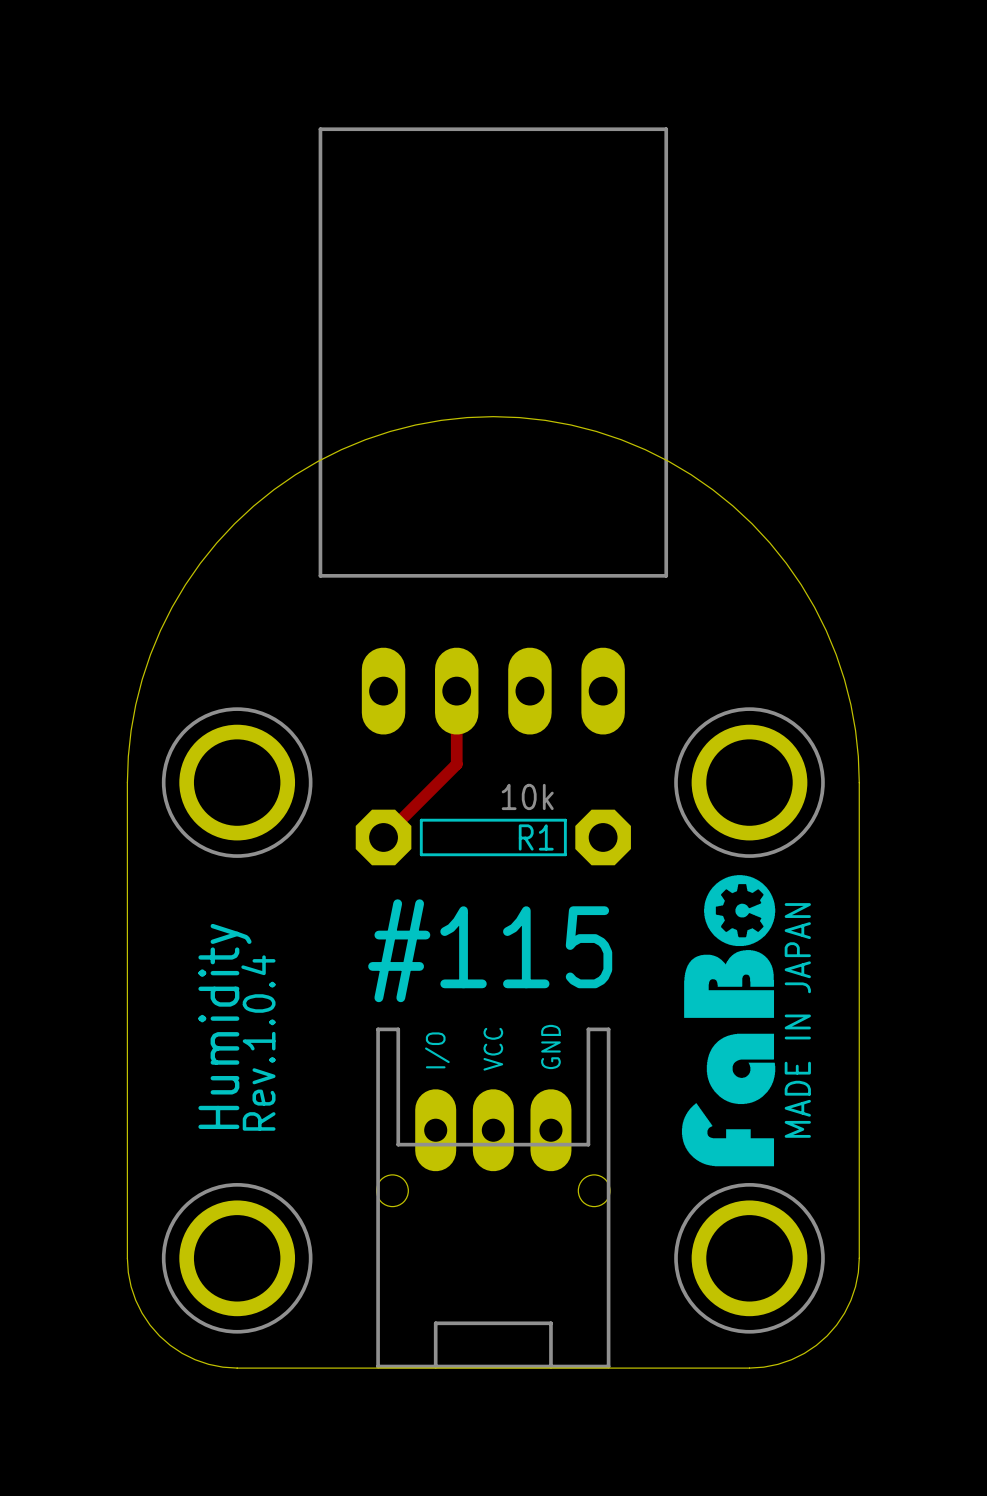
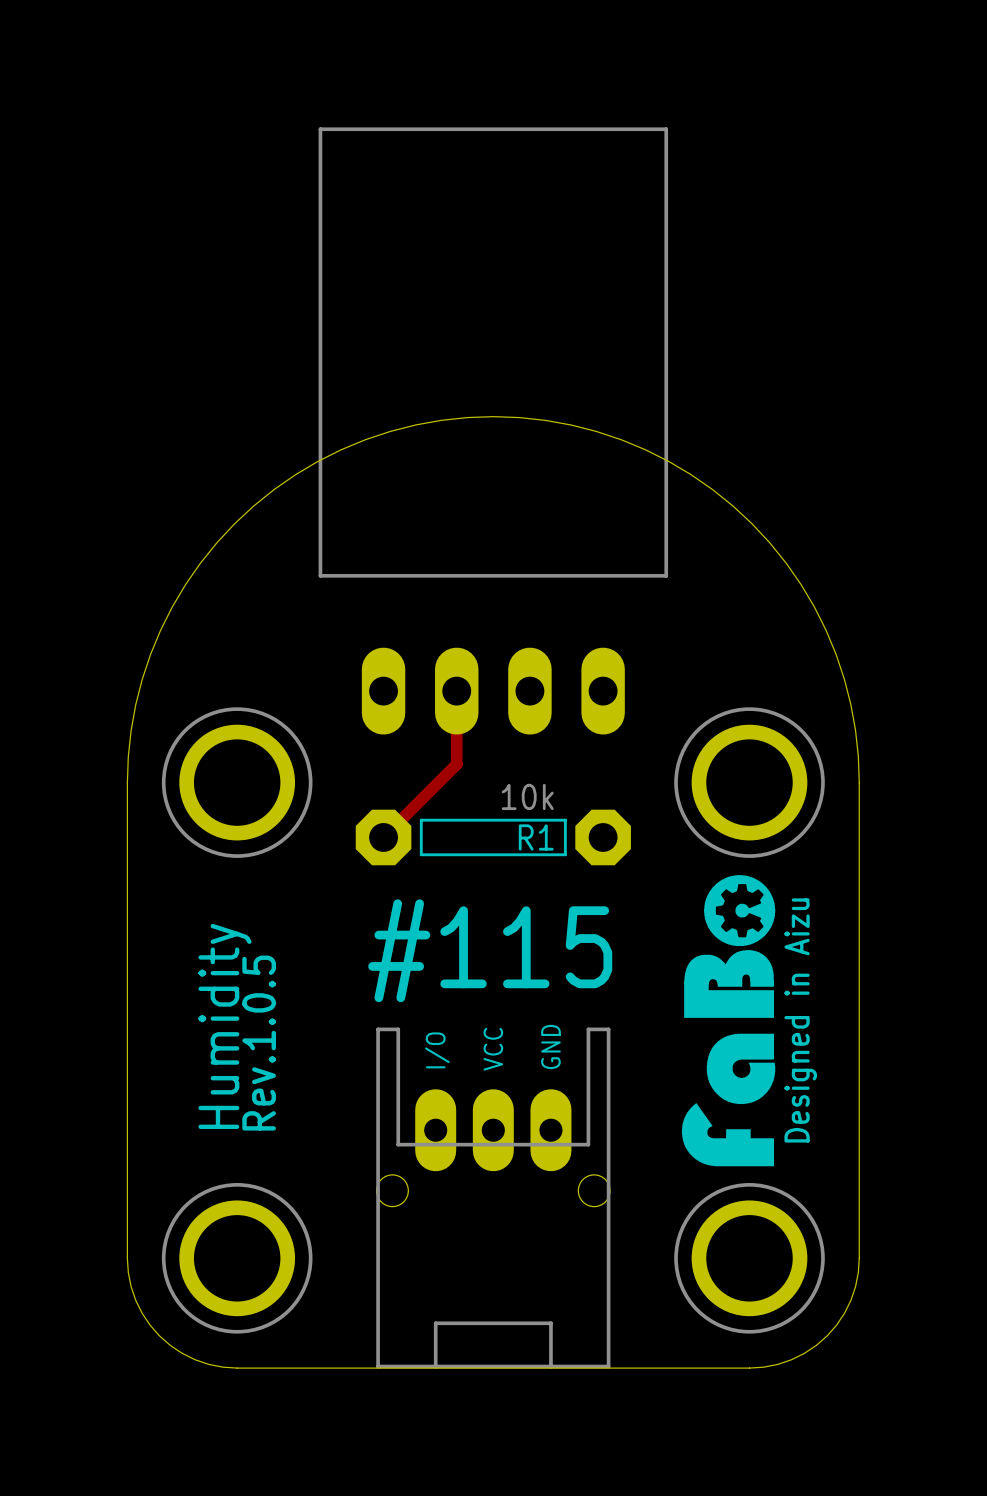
text: MADE IN JAPAN (797, 1020) -> Designed in Aizu (800, 1020)
text: Rev.1.0.4 (258, 1043) -> Rev.1.0.5 (259, 1043)

